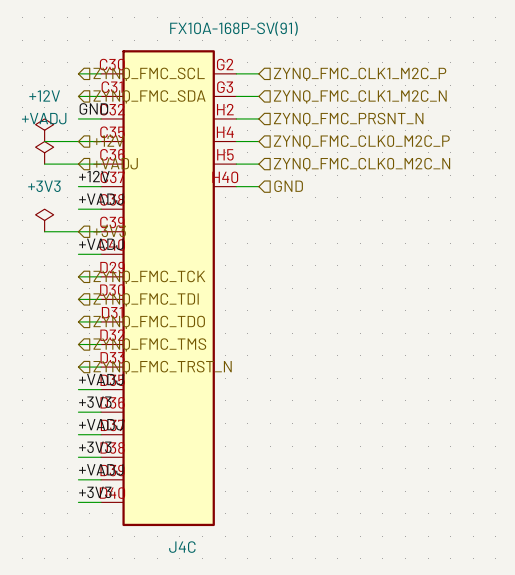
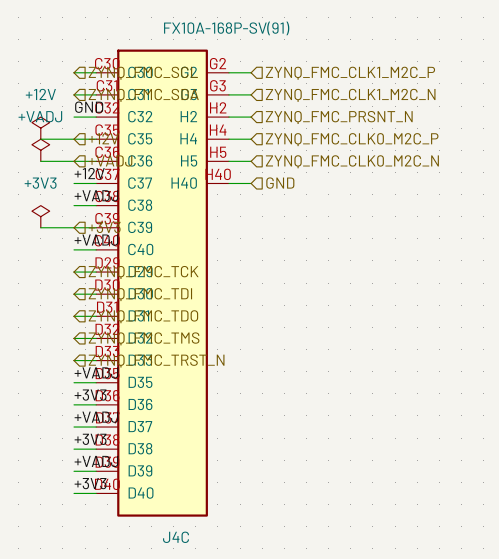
J4C symbol: [101, 50, 237, 527] -> [96, 49, 229, 517]

